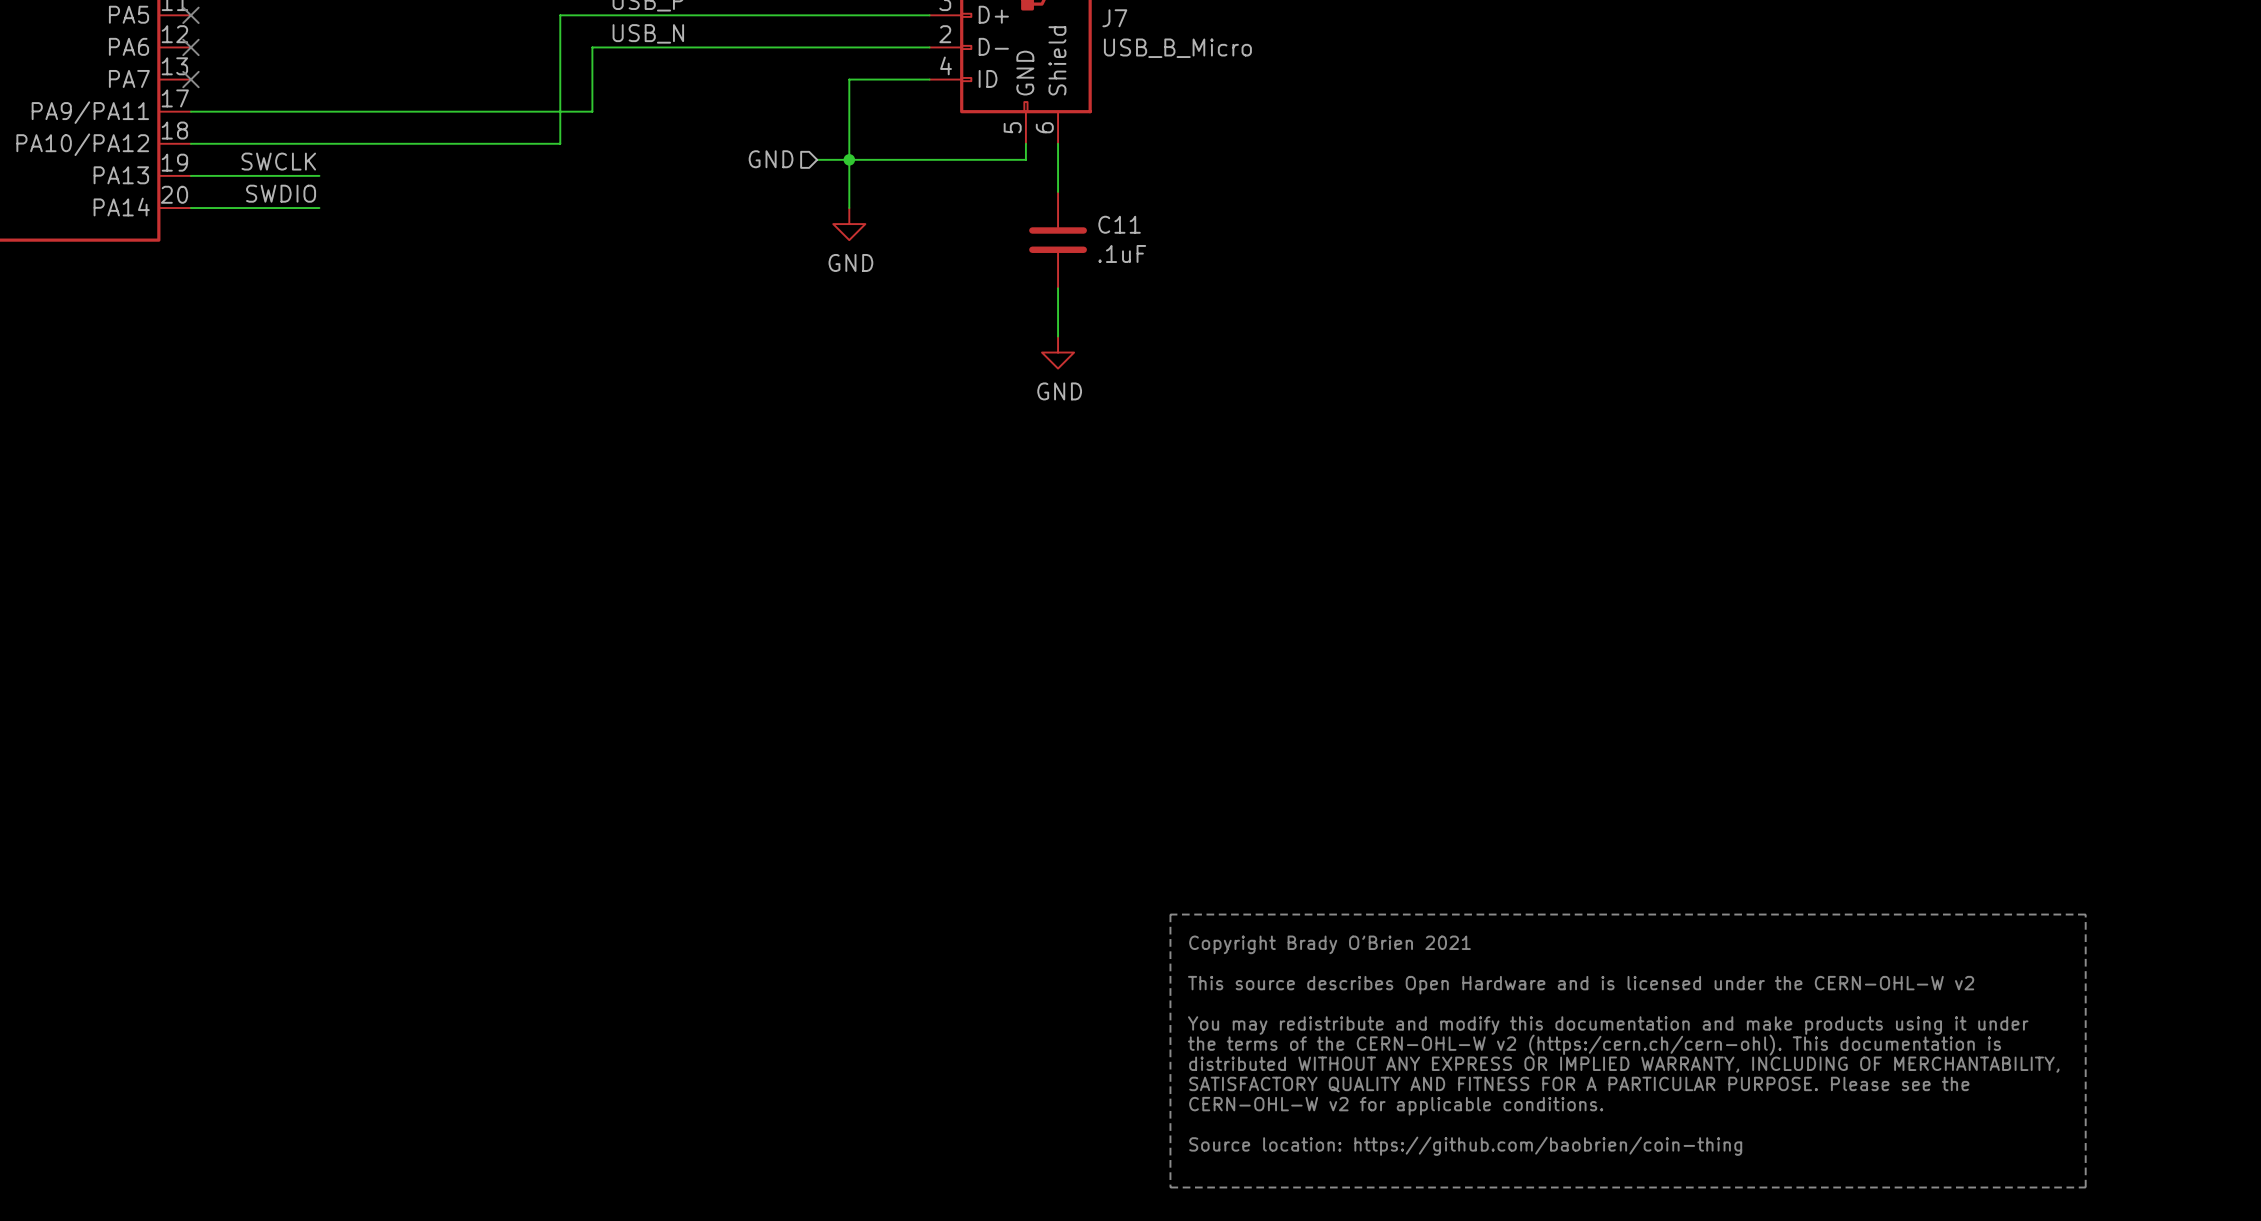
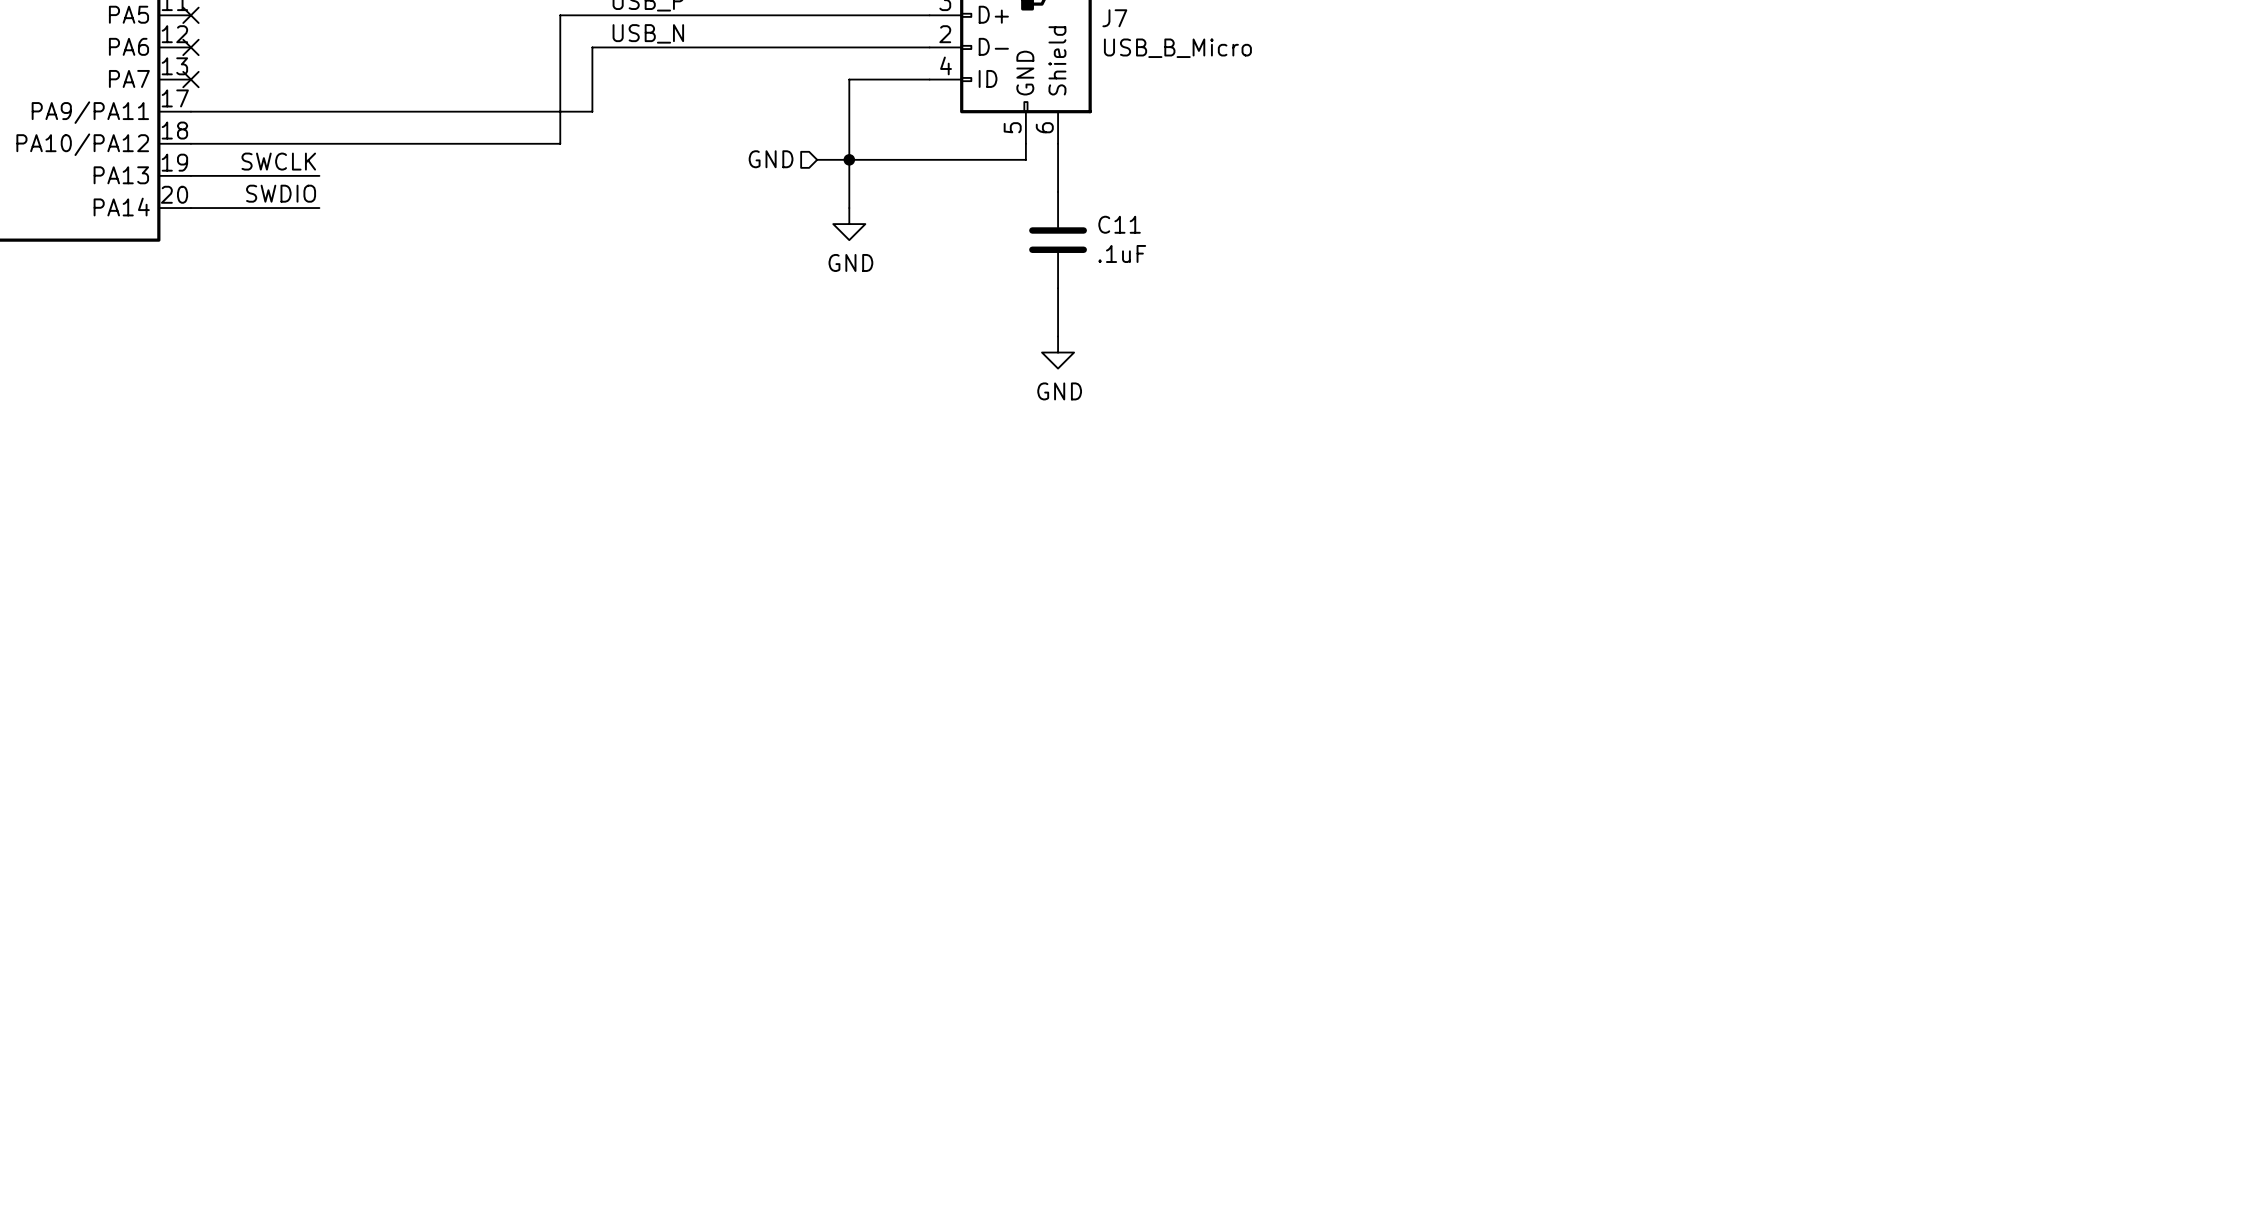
line: (1170, 914) (1170, 1187) (2085, 1187) (2085, 914) (1170, 914) -> none
text: Copyright Brady O’Brien 2021 (1330, 944) -> none
text: This source describes Open Hardware and is licensed under the CERN-OHL-W v2 (1581, 985) -> none
text: You may redistribute and modify this documentation and make products using it under (1608, 1025) -> none
text: the terms of the CERN-OHL-W v2 (https:/cern.ch/cern-ohl). This documentation is (1594, 1045) -> none
text: distributed WITHOUT ANY EXPRESS OR IMPLIED WARRANTY, INCLUDING OF MERCHANTABILITY, (1624, 1064) -> none
text: SATISFACTORY QUALITY AND FITNESS FOR A PARTICULAR PURPOSE. Please see the (1579, 1084) -> none
text: CERN-OHL-W v2 for applicable conditions. (1396, 1106) -> none
text: Source location: https://github.com/baobrien/coin-thing (1465, 1146) -> none

